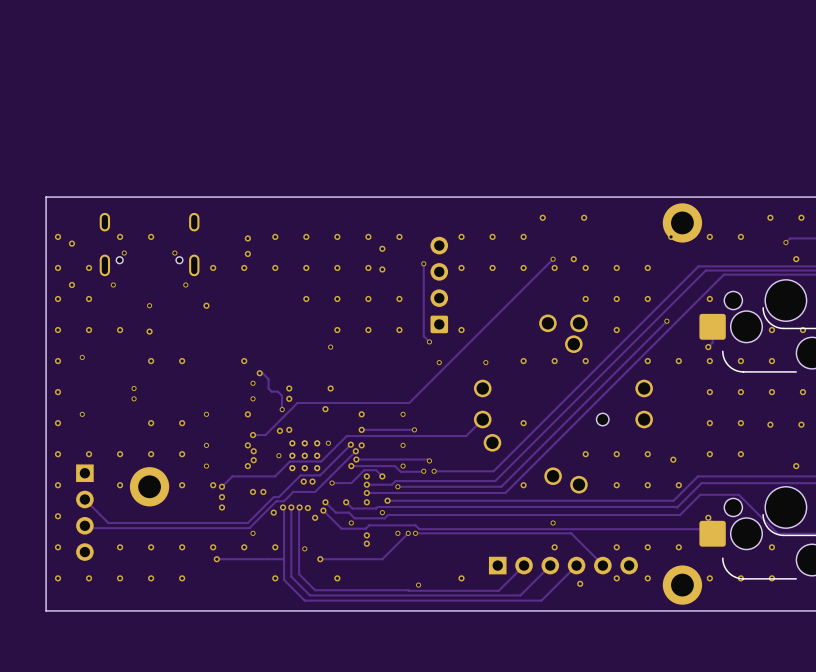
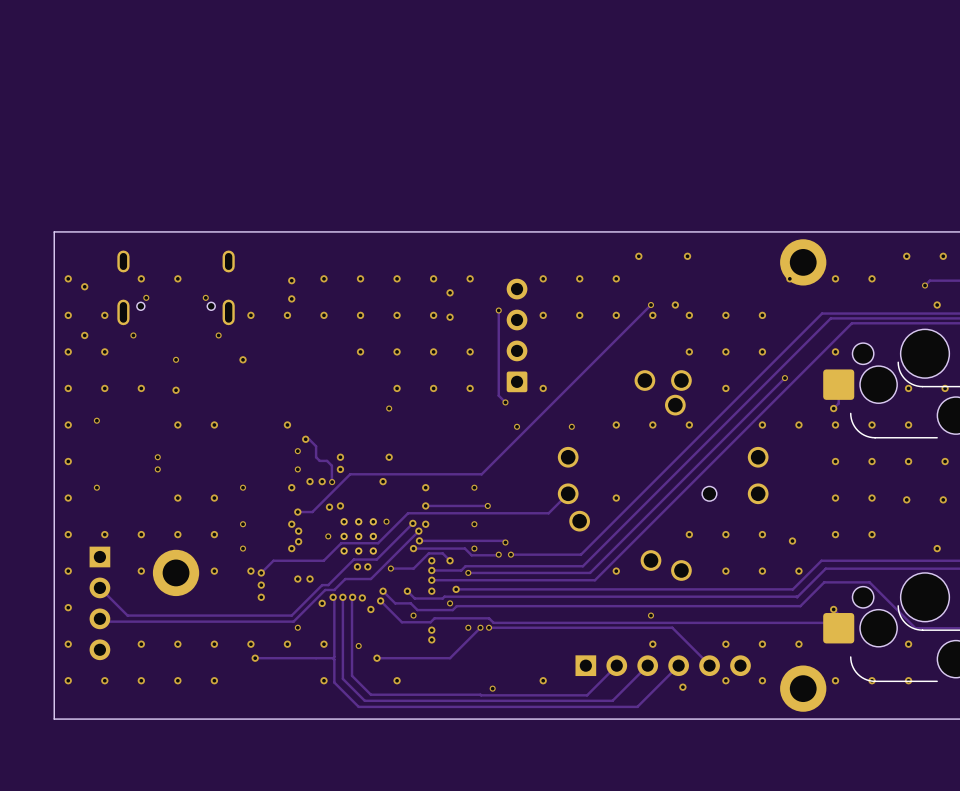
via: none -> (310, 481)
via: none -> (322, 481)

